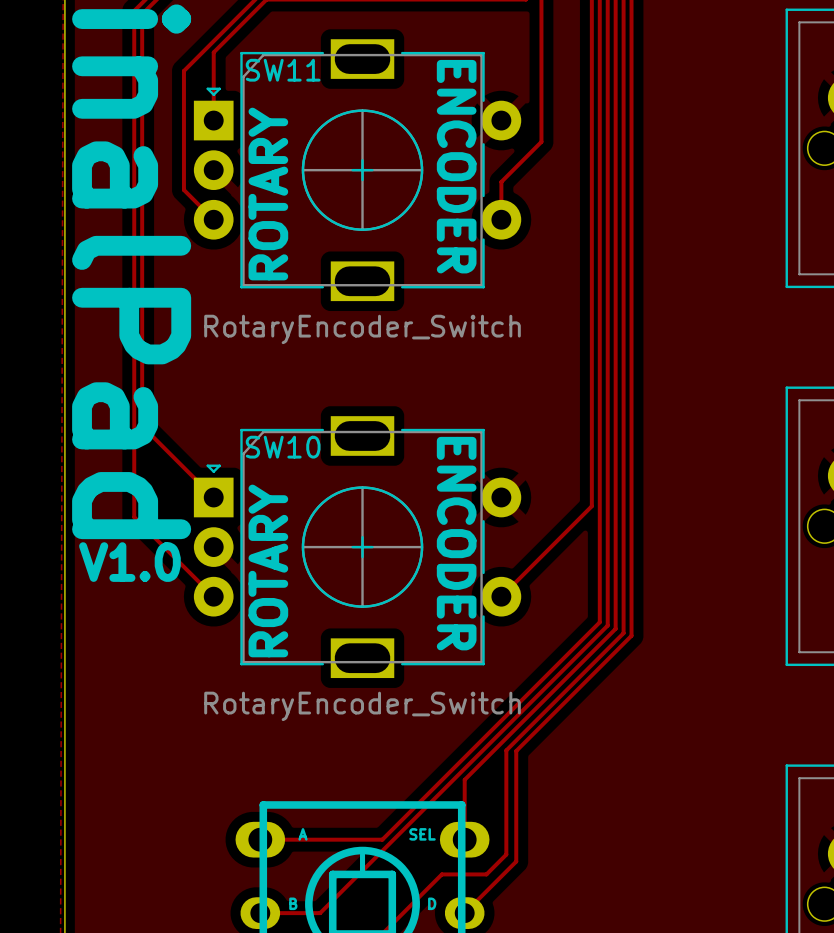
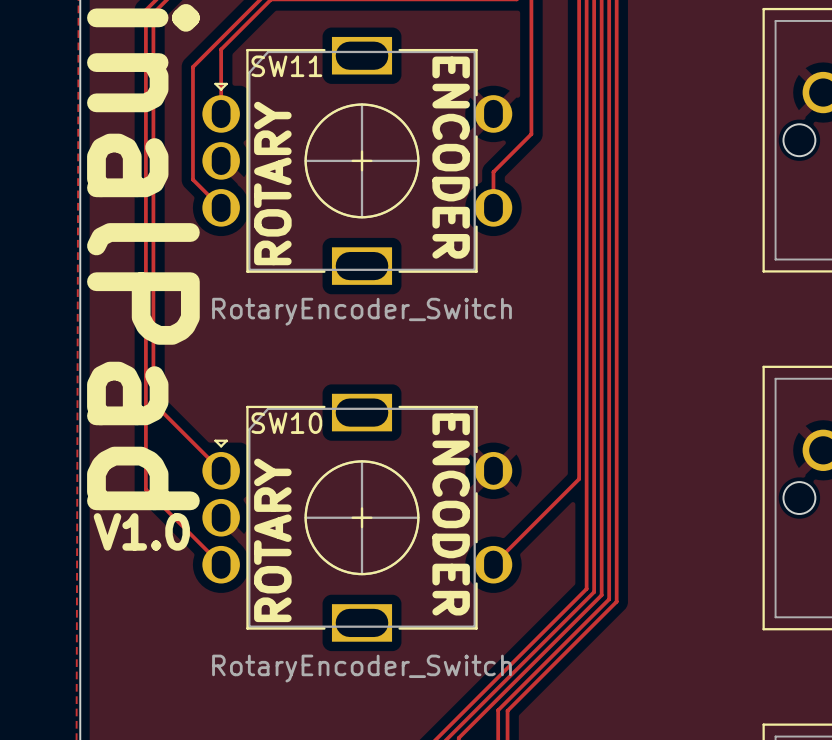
SW11 footprint: [193, 39, 522, 302] -> [202, 36, 513, 285]
SW10 footprint: [193, 416, 522, 679] -> [202, 393, 513, 642]

